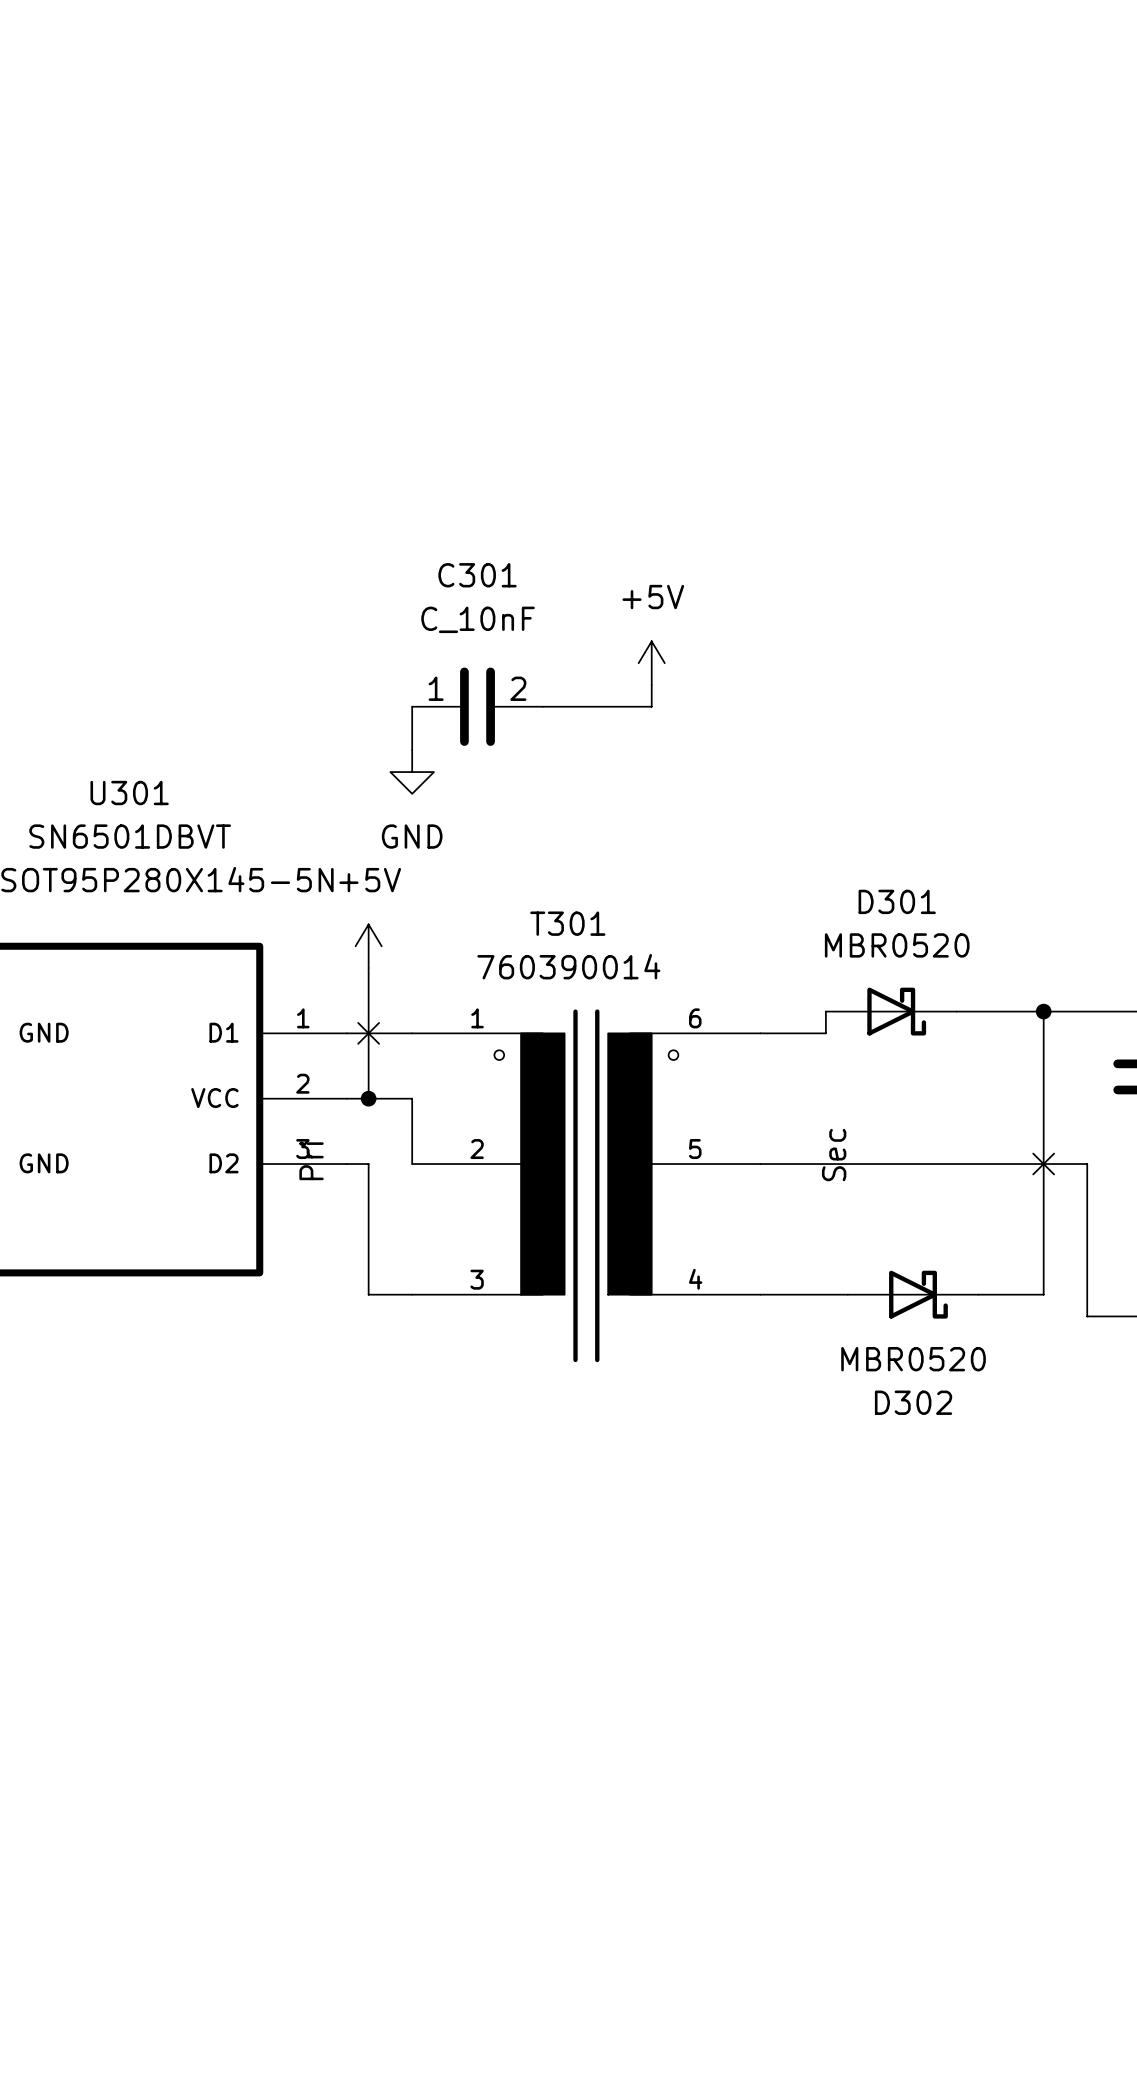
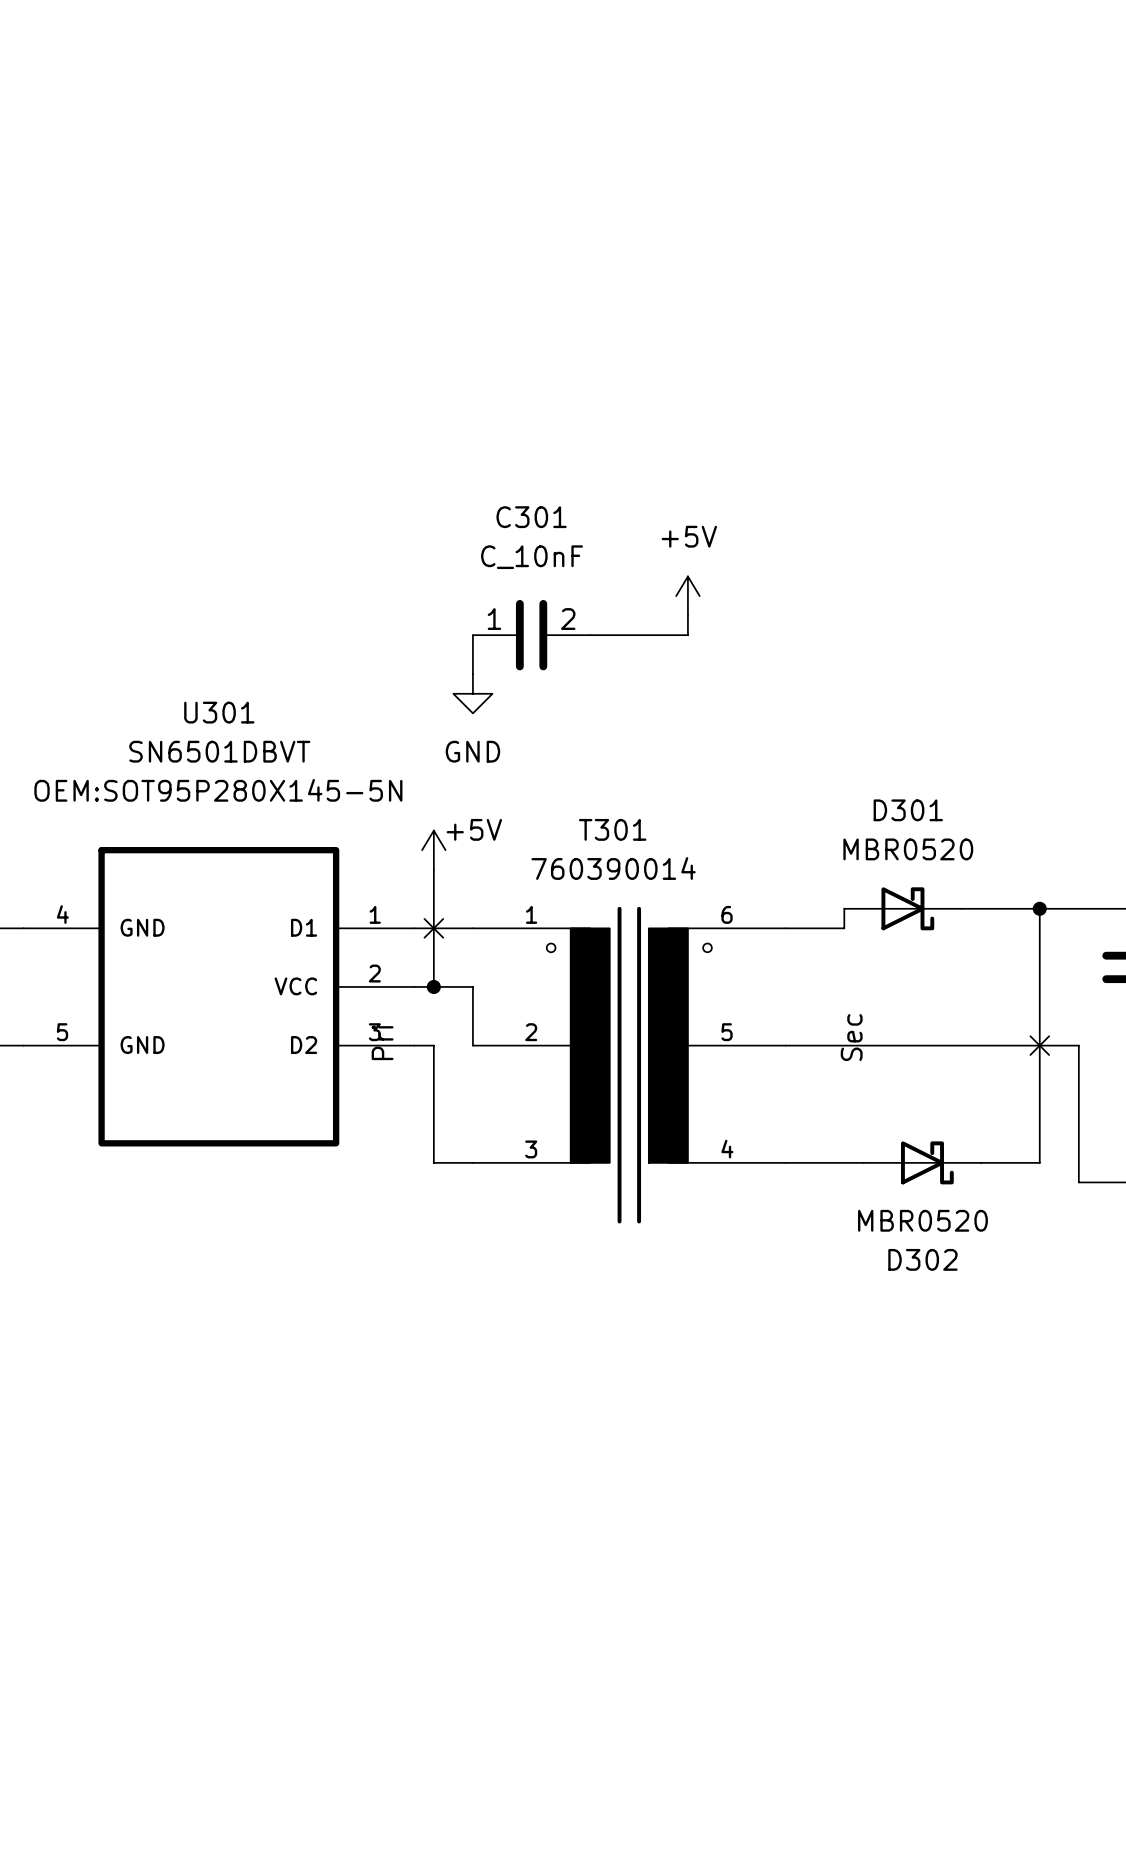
power symbol text position: +5V (370, 880) -> +5V (474, 829)

